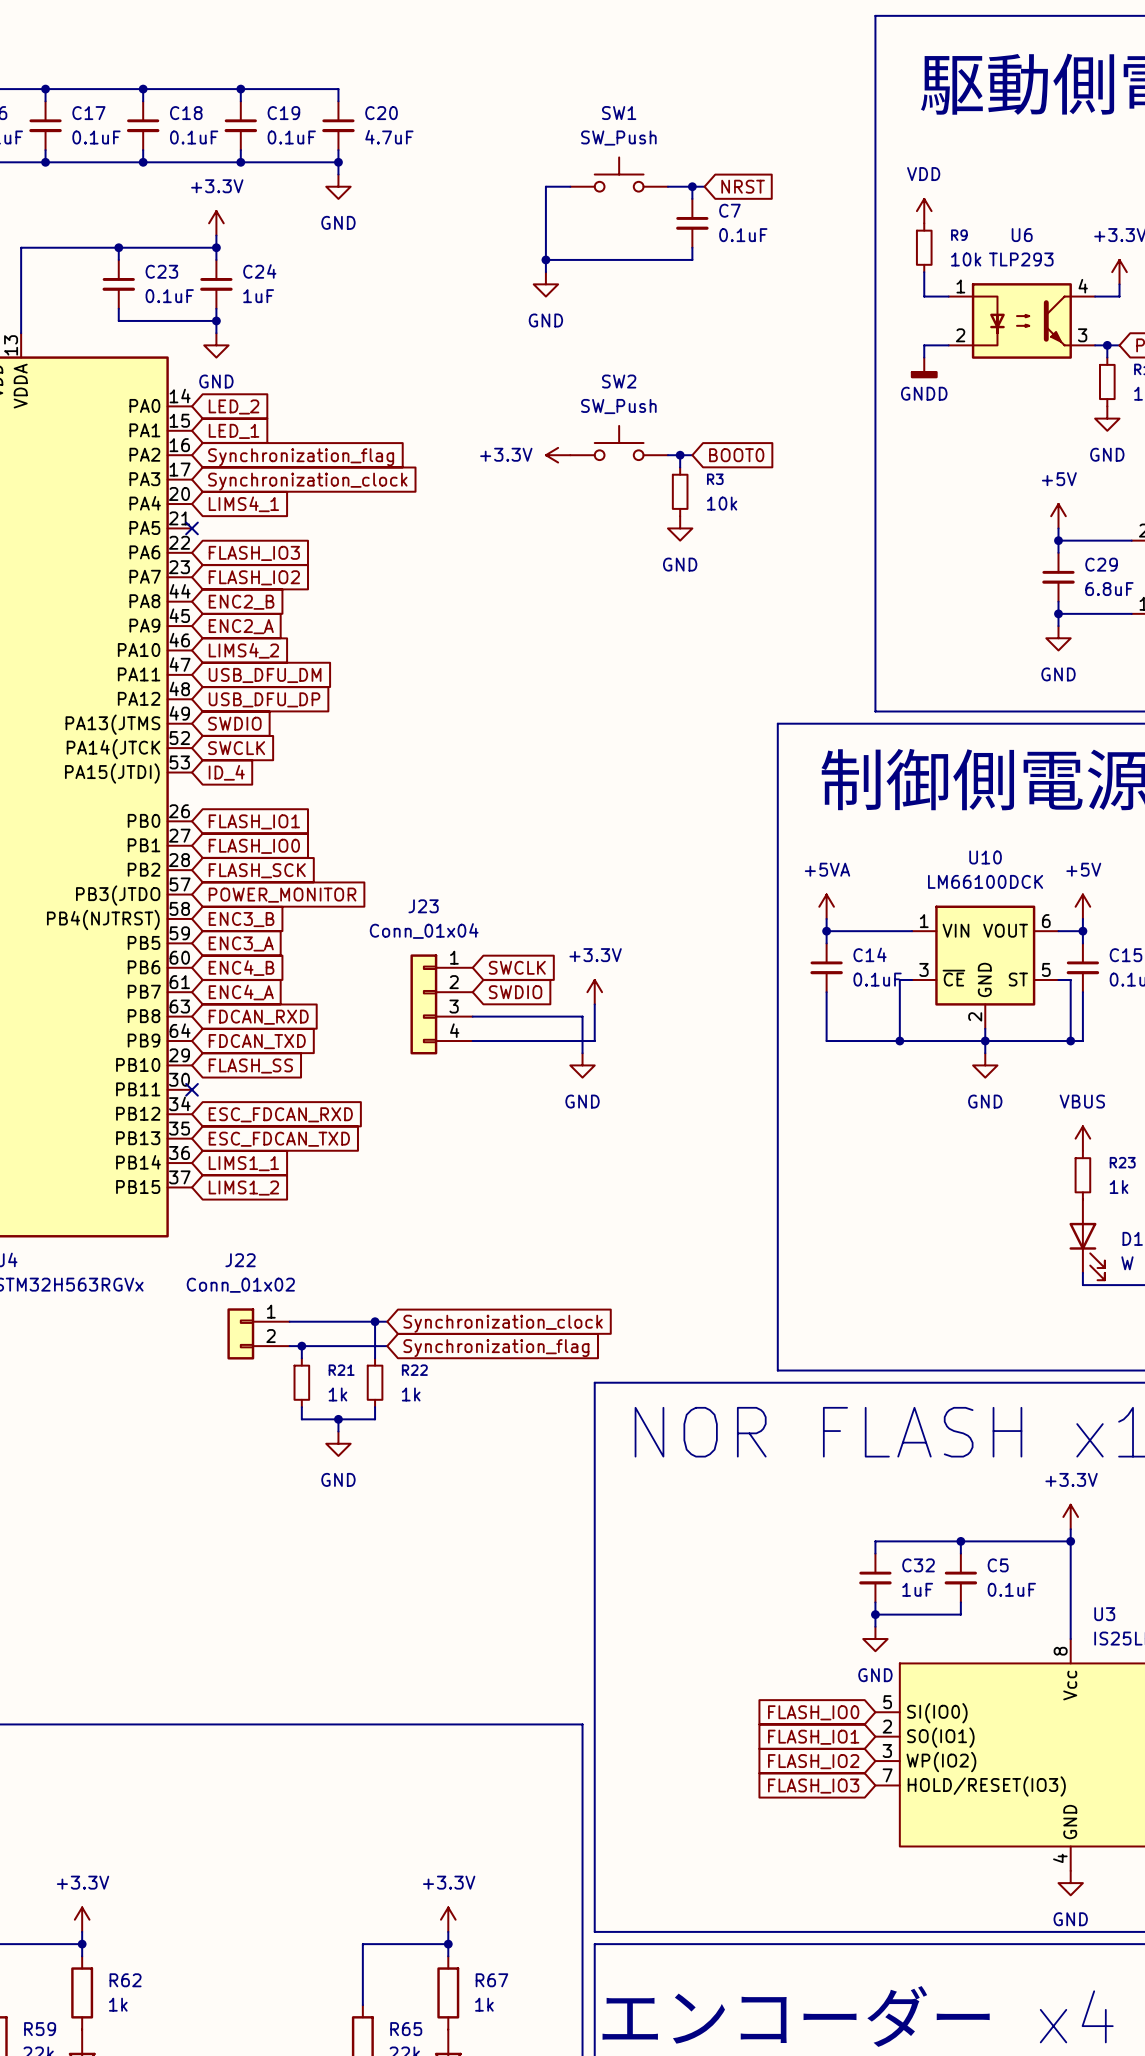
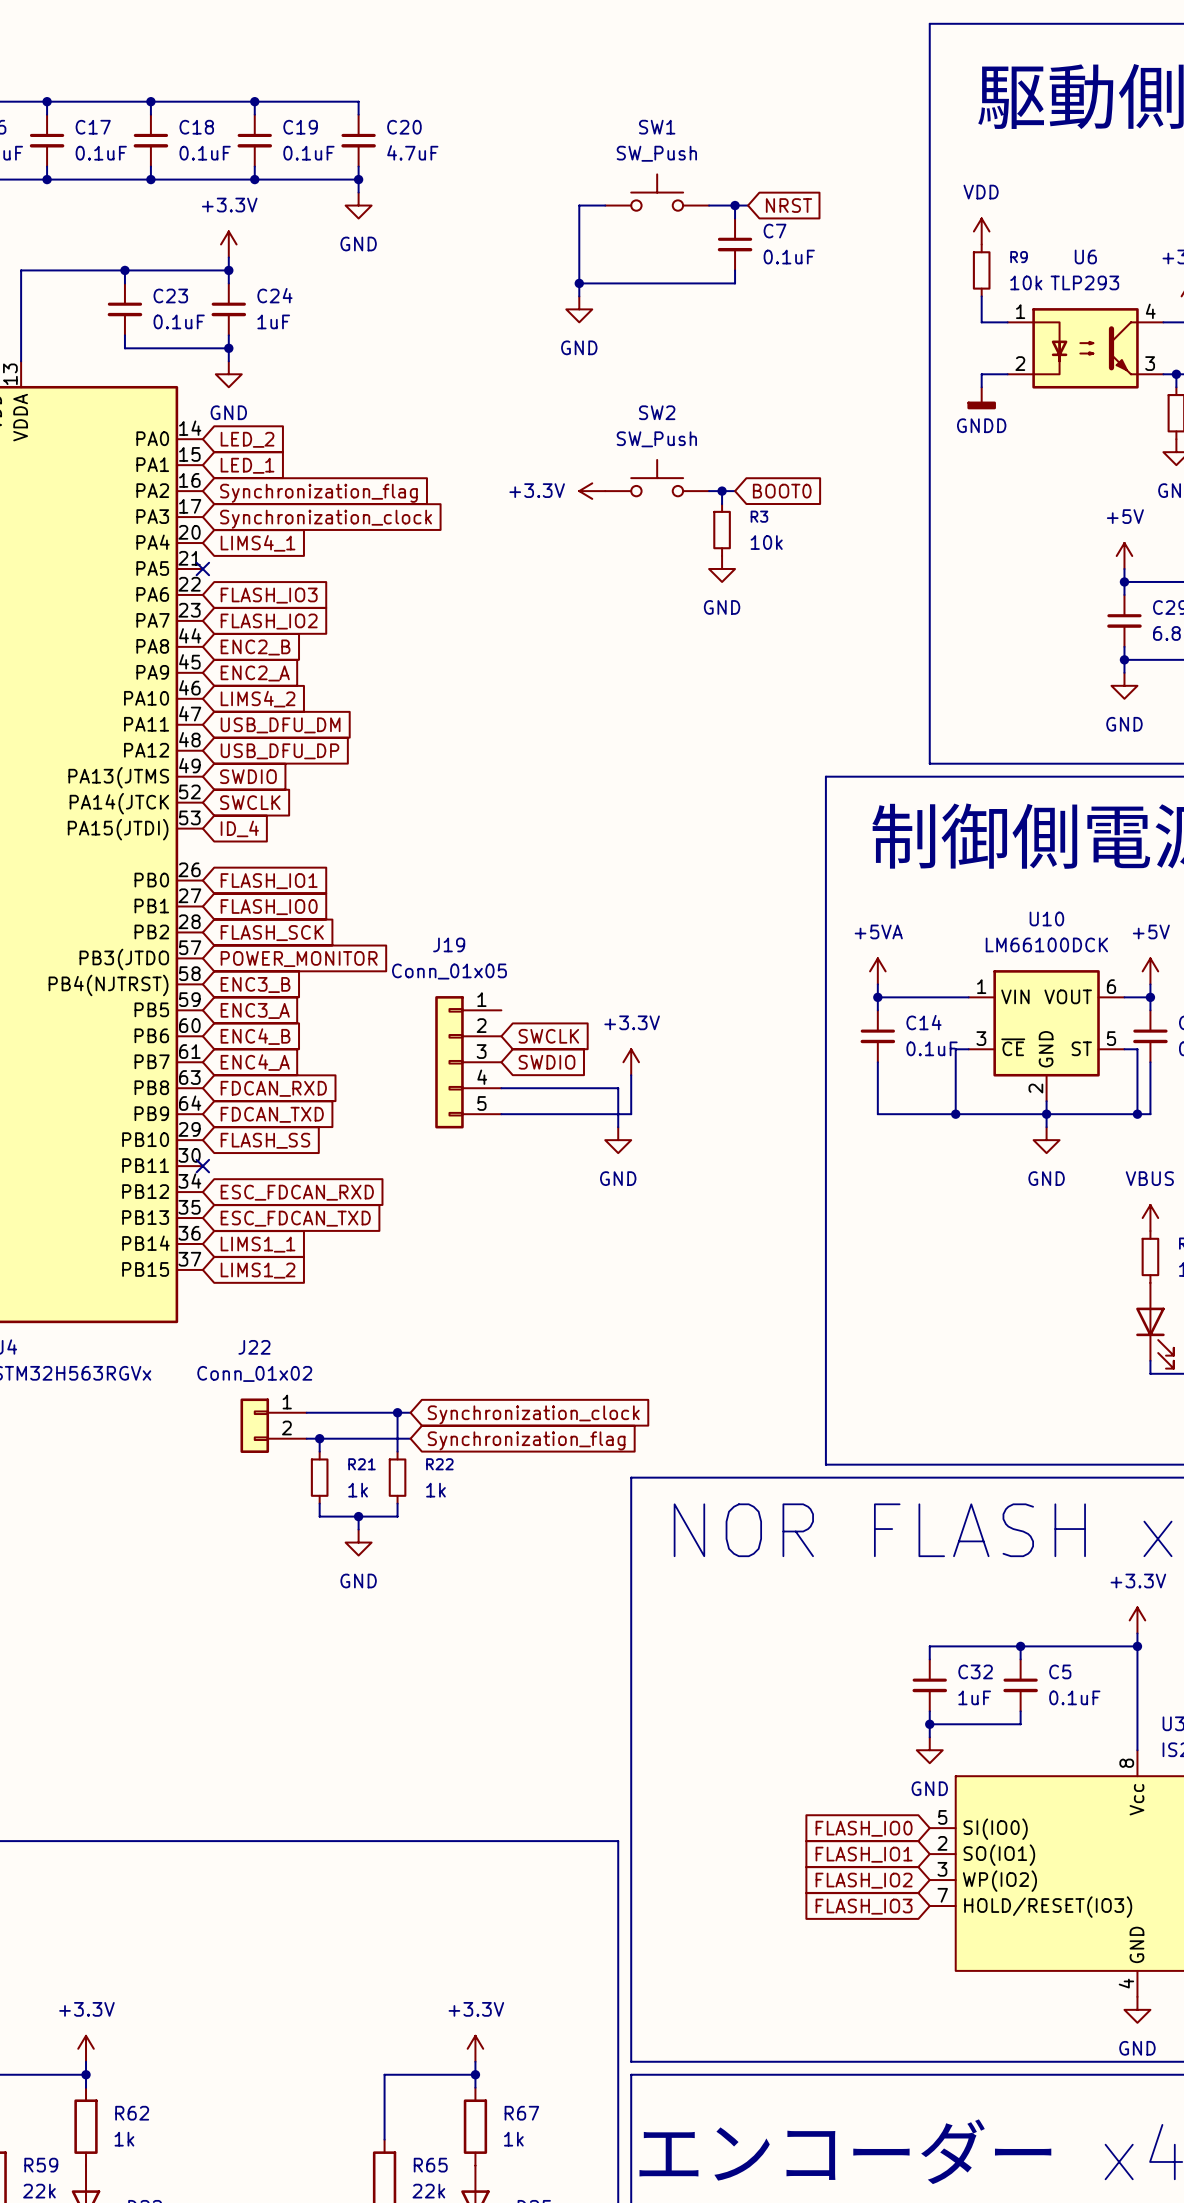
J19: none -> Conn_01x05 (468, 1062)
J23: Conn_01x04 (441, 1004) -> none

